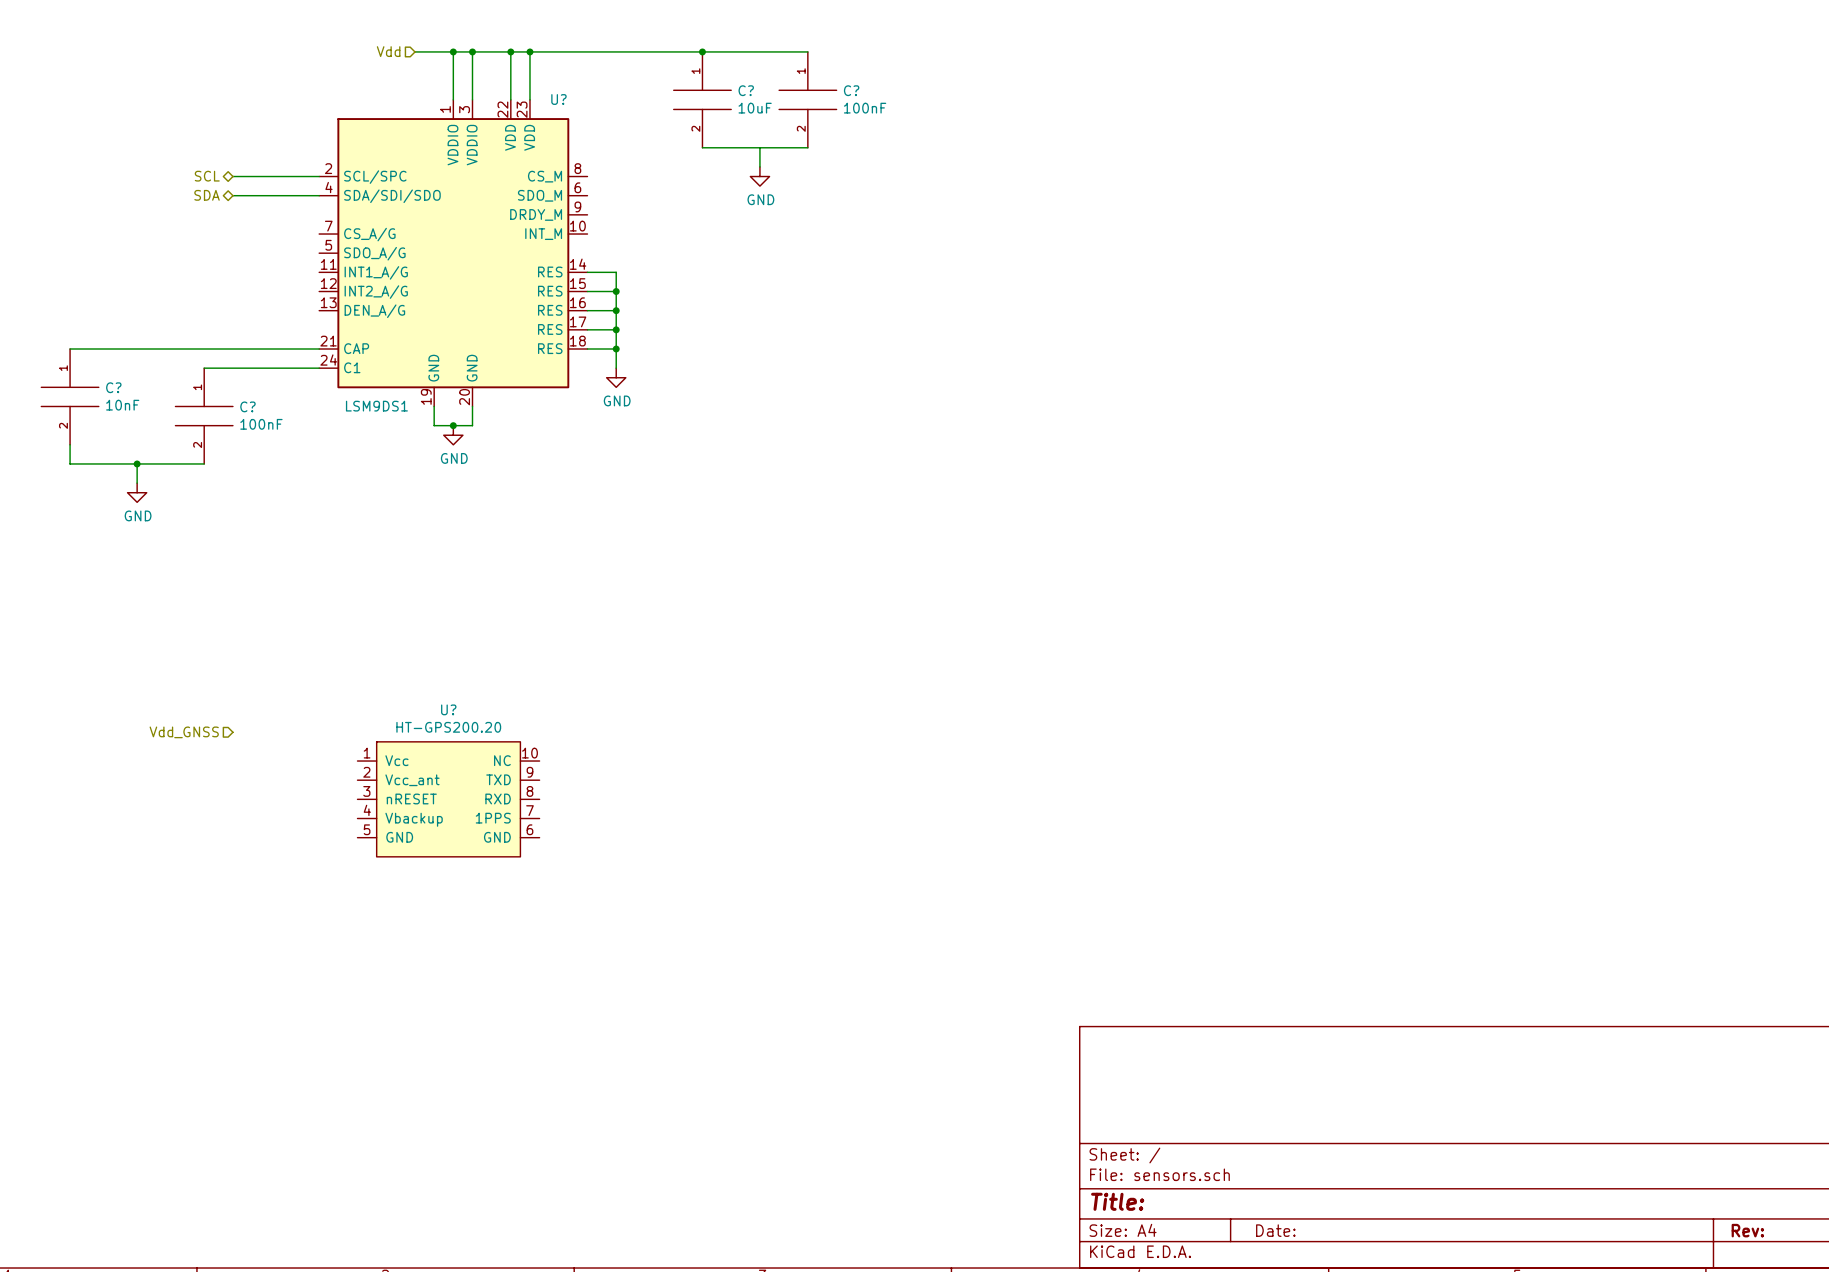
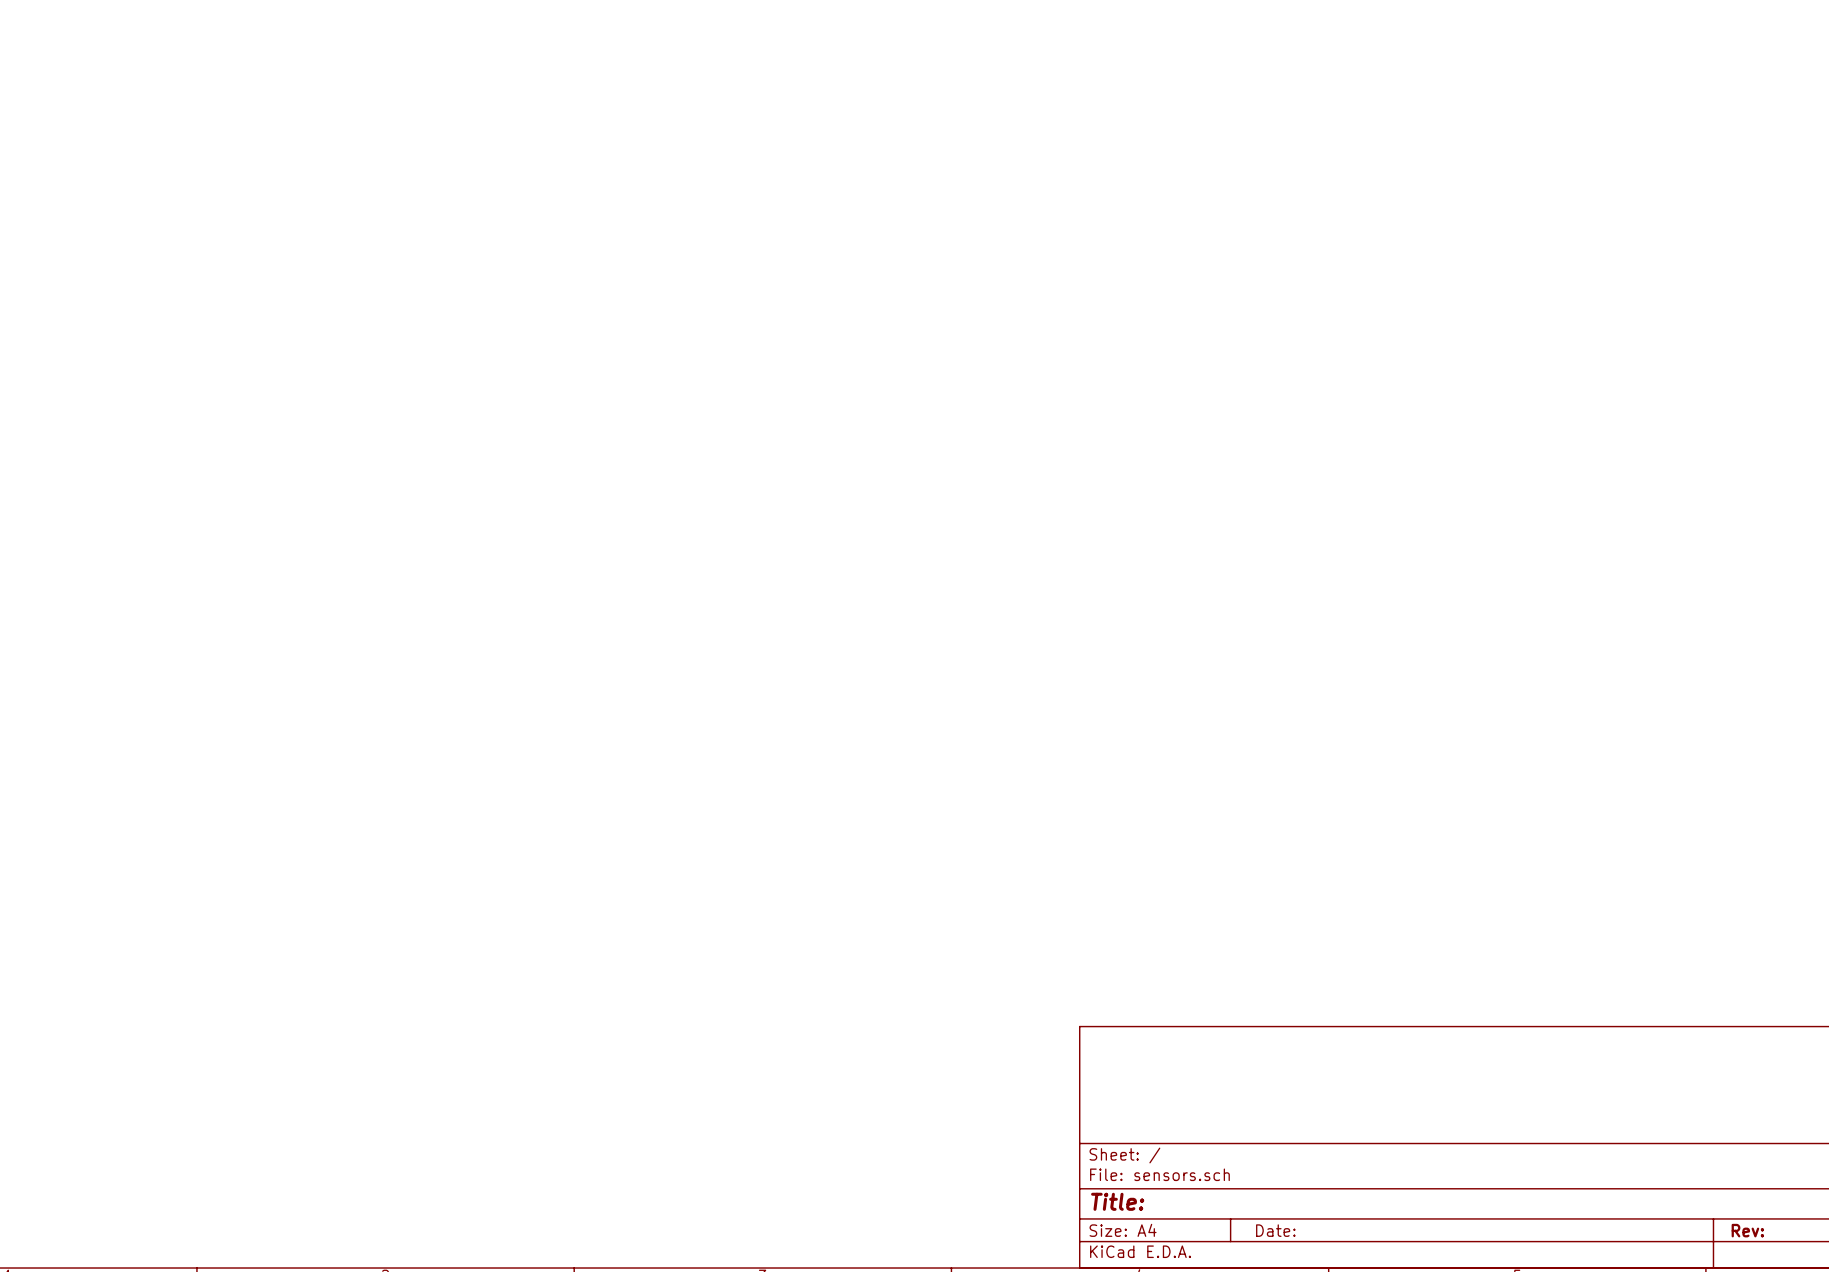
hierarchical label: Vdd (388, 51) -> none
wire: (415, 51) (807, 51) -> none
wire: (453, 51) (453, 99) -> none
junction: (453, 51) -> none
wire: (472, 51) (472, 99) -> none
junction: (472, 51) -> none
wire: (510, 51) (510, 99) -> none
junction: (510, 51) -> none
wire: (529, 51) (529, 99) -> none
junction: (529, 51) -> none
junction: (702, 51) -> none
C?: 10uF (702, 99) -> none
C?: 100nF (807, 99) -> none
wire: (702, 147) (807, 147) -> none
wire: (759, 147) (759, 166) -> none
hierarchical label: SCL (207, 176) -> none
wire: (232, 176) (319, 176) -> none
power symbol: GND (759, 176) -> none
hierarchical label: SDA (207, 195) -> none
wire: (232, 195) (319, 195) -> none
U?: LSM9DS1 (453, 253) -> none
wire: (587, 272) (616, 272) (616, 368) -> none
wire: (587, 291) (616, 291) -> none
junction: (616, 291) -> none
wire: (587, 310) (616, 310) -> none
junction: (616, 310) -> none
wire: (587, 329) (616, 329) -> none
junction: (616, 329) -> none
wire: (70, 349) (319, 349) -> none
wire: (587, 349) (616, 349) -> none
junction: (616, 349) -> none
wire: (204, 368) (319, 368) -> none
power symbol: GND (616, 377) -> none
C?: 10nF (70, 396) -> none
wire: (434, 406) (434, 425) (472, 425) (472, 406) -> none
C?: 100nF (204, 416) -> none
junction: (453, 425) -> none
power symbol: GND (453, 435) -> none
wire: (70, 444) (70, 463) (204, 463) -> none
wire: (137, 463) (137, 483) -> none
junction: (137, 463) -> none
power symbol: GND (137, 492) -> none
hierarchical label: Vdd_GNSS (184, 732) -> none
U?: HT-GPS200.20 (448, 799) -> none

